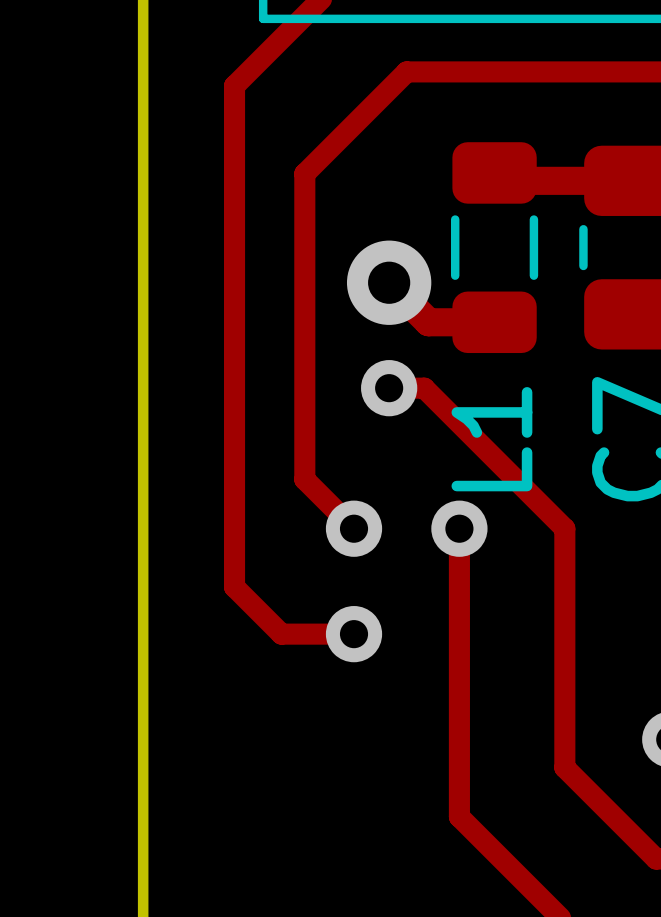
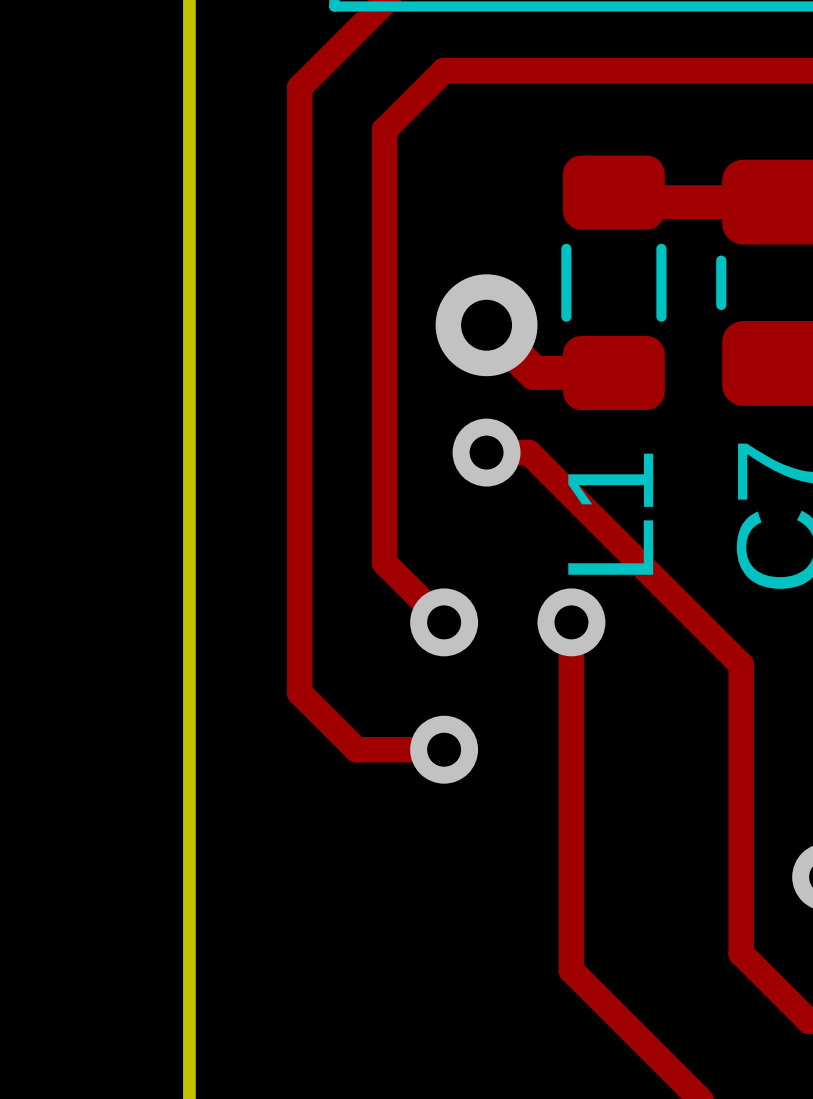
track: (406, 71) (304, 173) -> (507, 70) (444, 70) (384, 129) (384, 193)
track: (564, 528) (564, 767) (599, 802) -> (698, 622) (741, 664) (741, 953)

